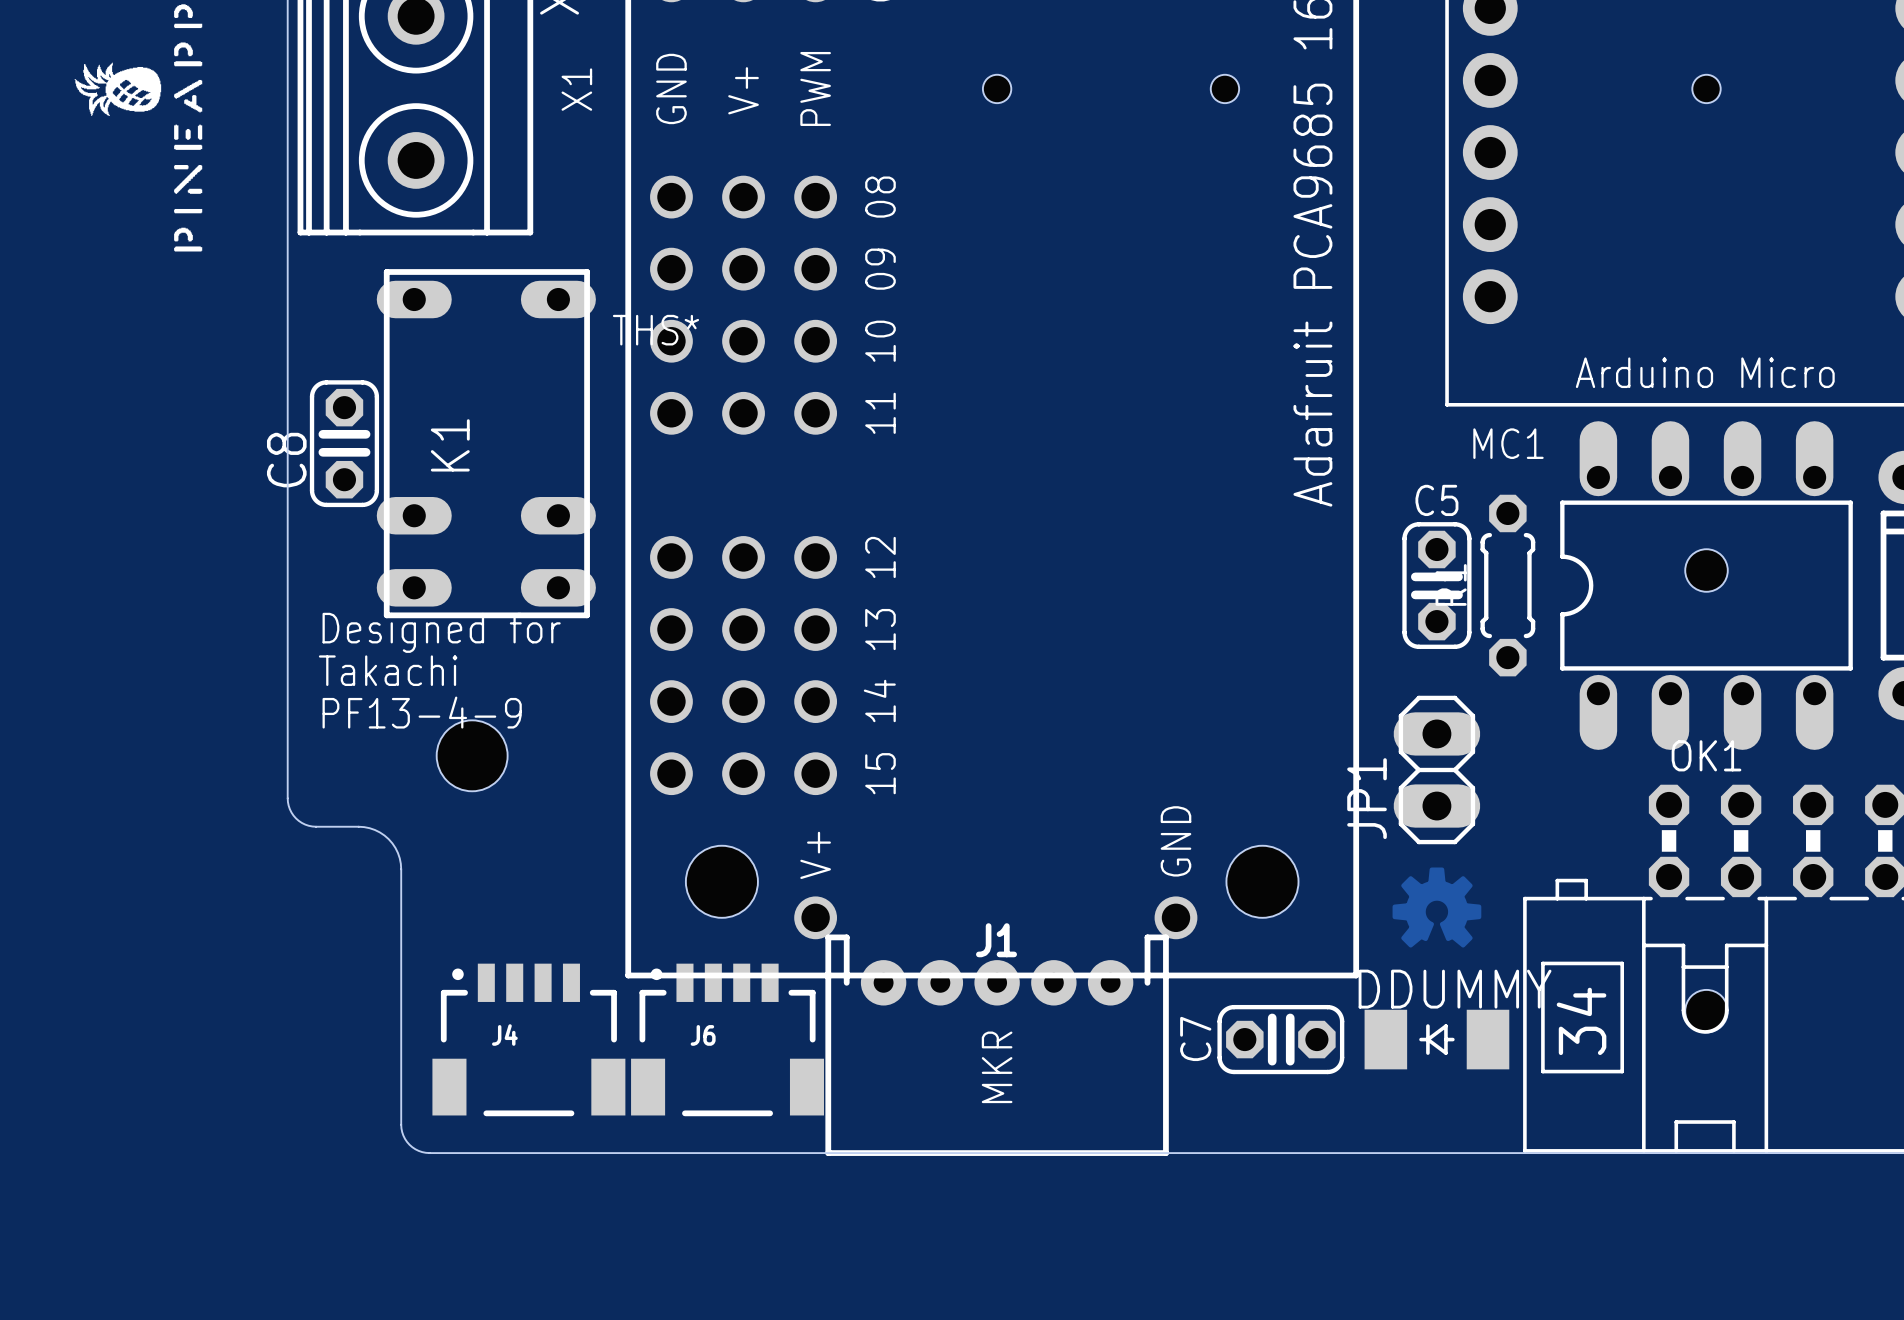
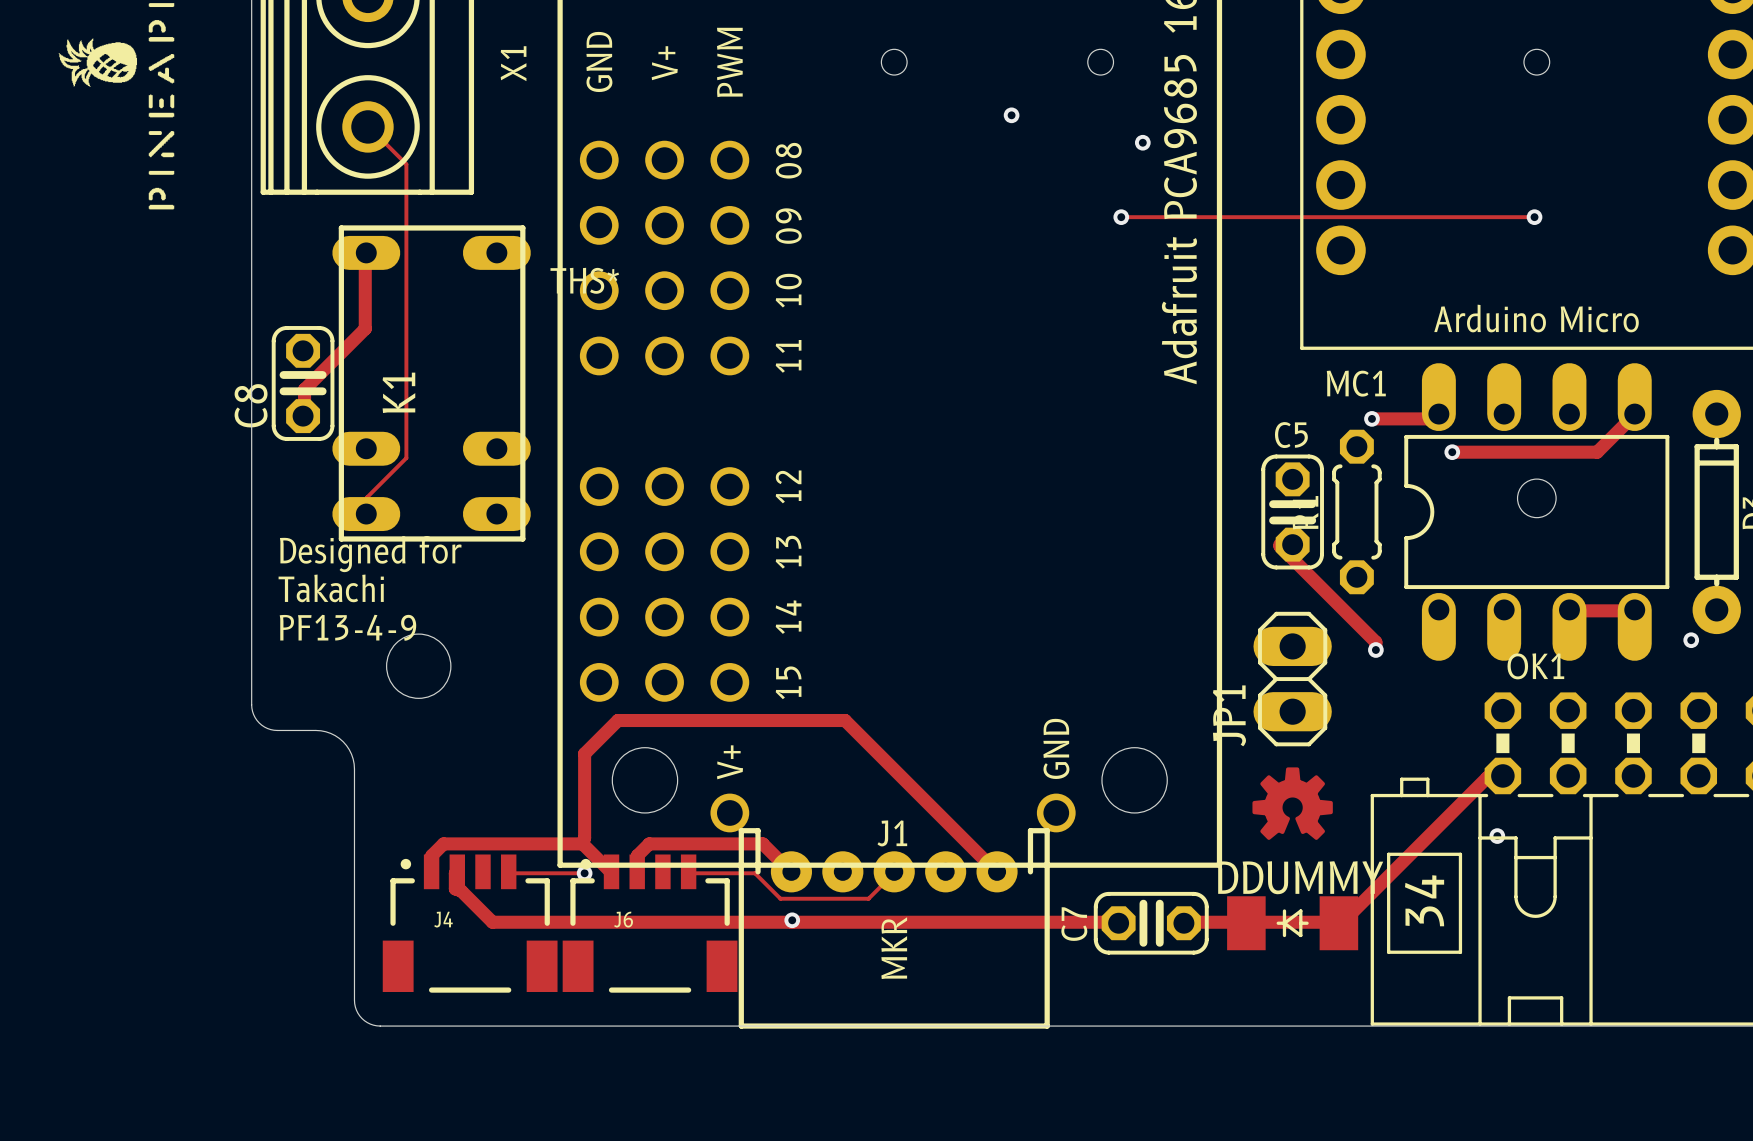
via: none -> (1011, 115)
track: none -> (367, 126) (406, 164) (406, 458) (367, 497) (366, 514)
via: none -> (1142, 142)
track: none -> (1121, 217) (1534, 217)
via: none -> (1121, 217)
via: none -> (1534, 217)
track: none -> (366, 252) (365, 328) (304, 389) (303, 416)
track: none -> (1438, 414) (1434, 418) (1371, 418)
track: none -> (1634, 414) (1597, 452) (1452, 452)
via: none -> (1371, 418)
via: none -> (1452, 452)
track: none -> (1279, 544) (1375, 642) (1375, 650)
track: none -> (1569, 609) (1634, 609)
via: none -> (1691, 640)
via: none -> (1375, 650)
track: none -> (1502, 775) (1487, 777) (1344, 920) (1338, 923) (1183, 923)
via: none -> (1497, 836)
track: none -> (582, 843) (443, 843) (431, 855) (431, 871)
track: none -> (582, 843) (611, 871)
track: none -> (582, 843) (584, 838) (584, 753) (617, 720) (845, 720) (997, 871)
track: none -> (457, 871) (455, 873) (455, 888) (461, 890) (492, 922) (1118, 923)
track: none -> (508, 871) (584, 873)
track: none -> (637, 871) (637, 855) (649, 843) (762, 843) (791, 871)
track: none -> (688, 871) (755, 873) (780, 898) (868, 898) (894, 871)
via: none -> (584, 873)
hole: (1706, 1011) -> none
via: none -> (792, 920)

